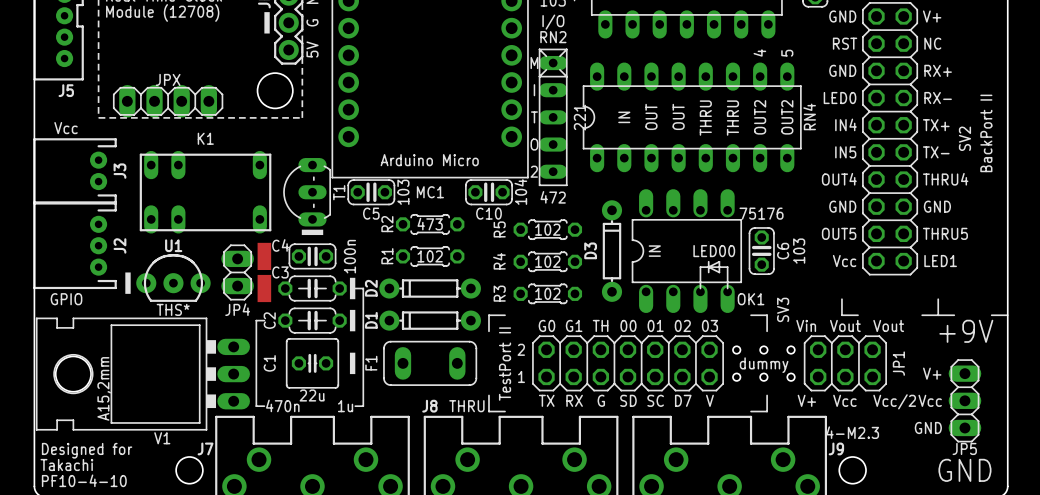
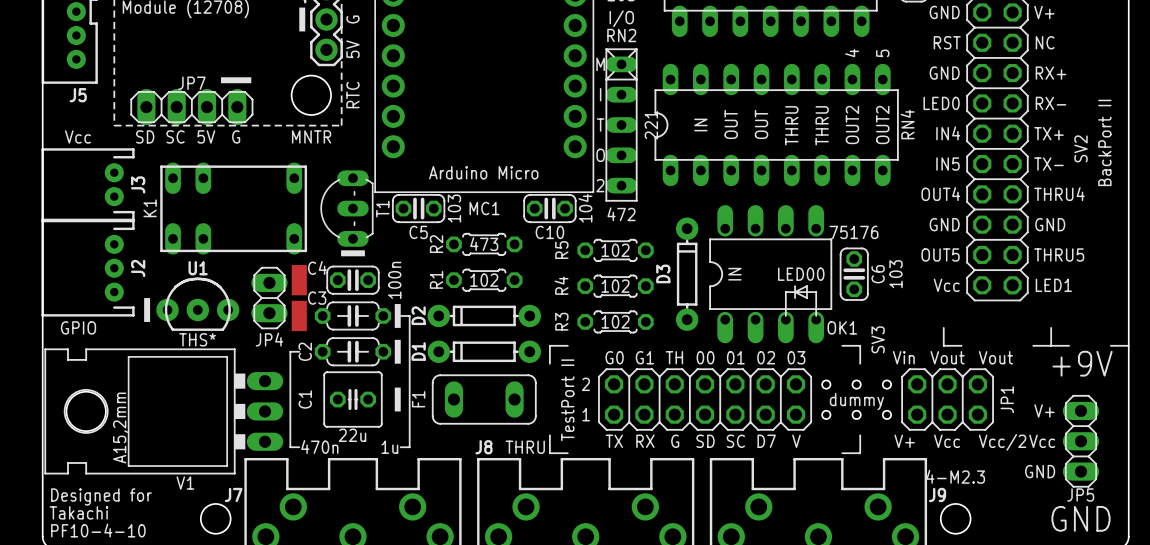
drawing: none -> [220, 77, 252, 84]
JPX name: JPX (168, 79) -> JP7 (191, 83)
text: none -> RTC (352, 95)
text: none -> SD (145, 136)
text: none -> SC (175, 136)
text: none -> 5V (206, 136)
text: none -> G (236, 136)
text: none -> MNTR (311, 136)
K1 name rotation: 0° (205, 138) -> 90° counterclockwise (150, 208)
K1 name position: K1 (205, 138) -> K1 (150, 208)

